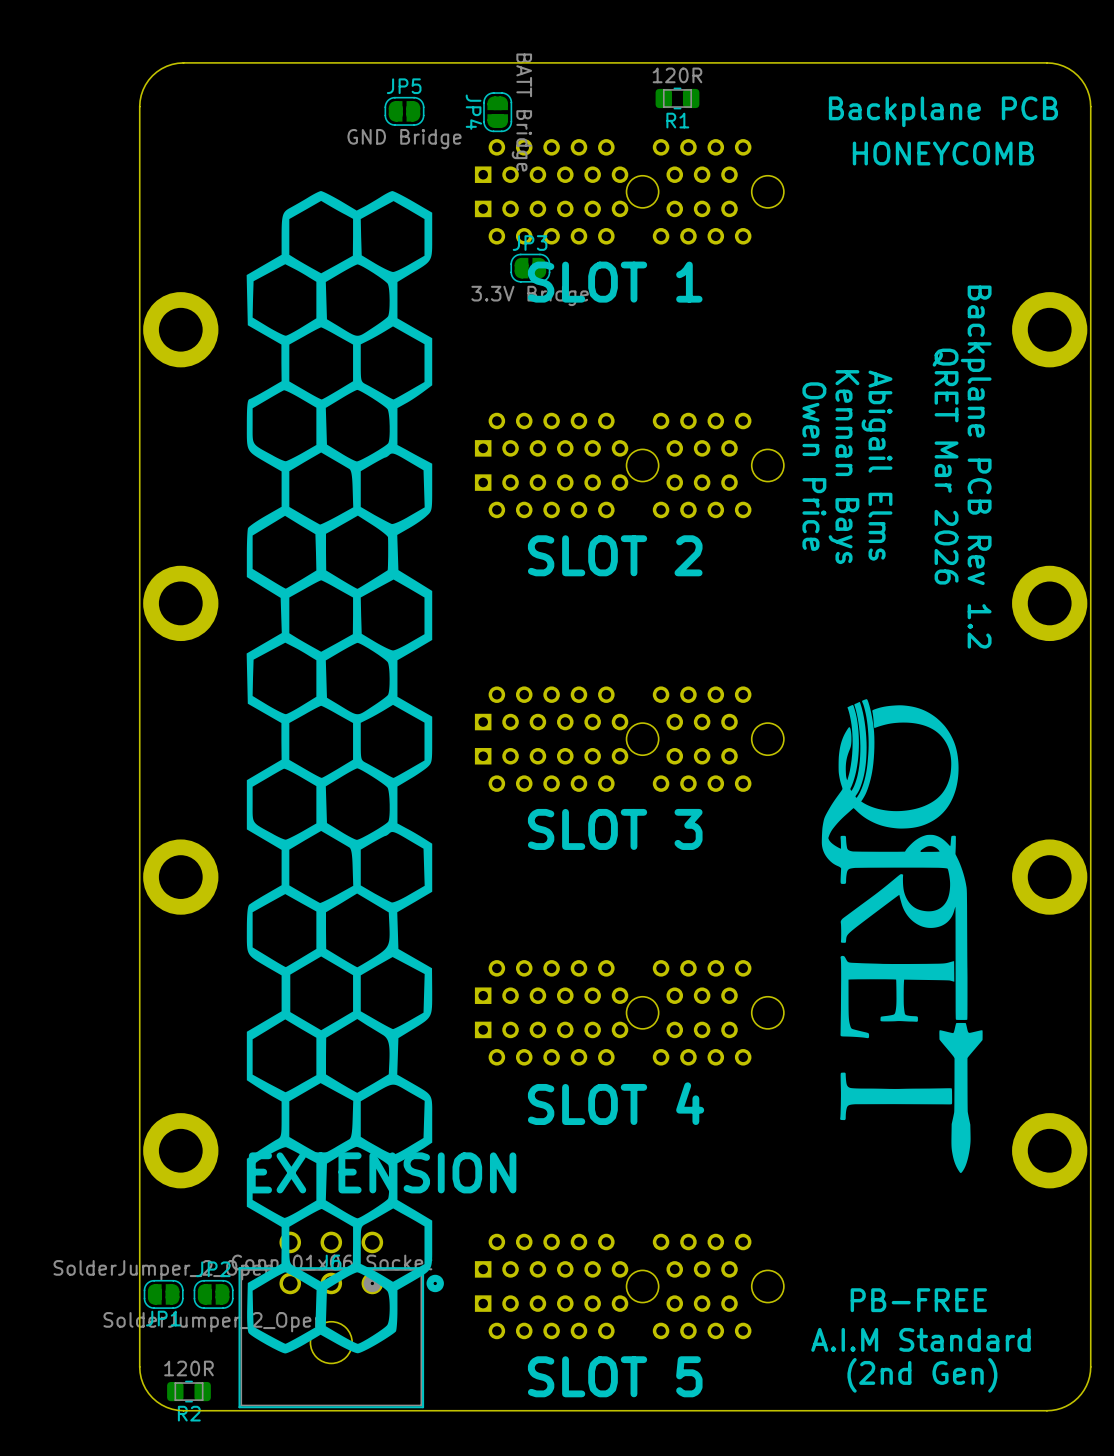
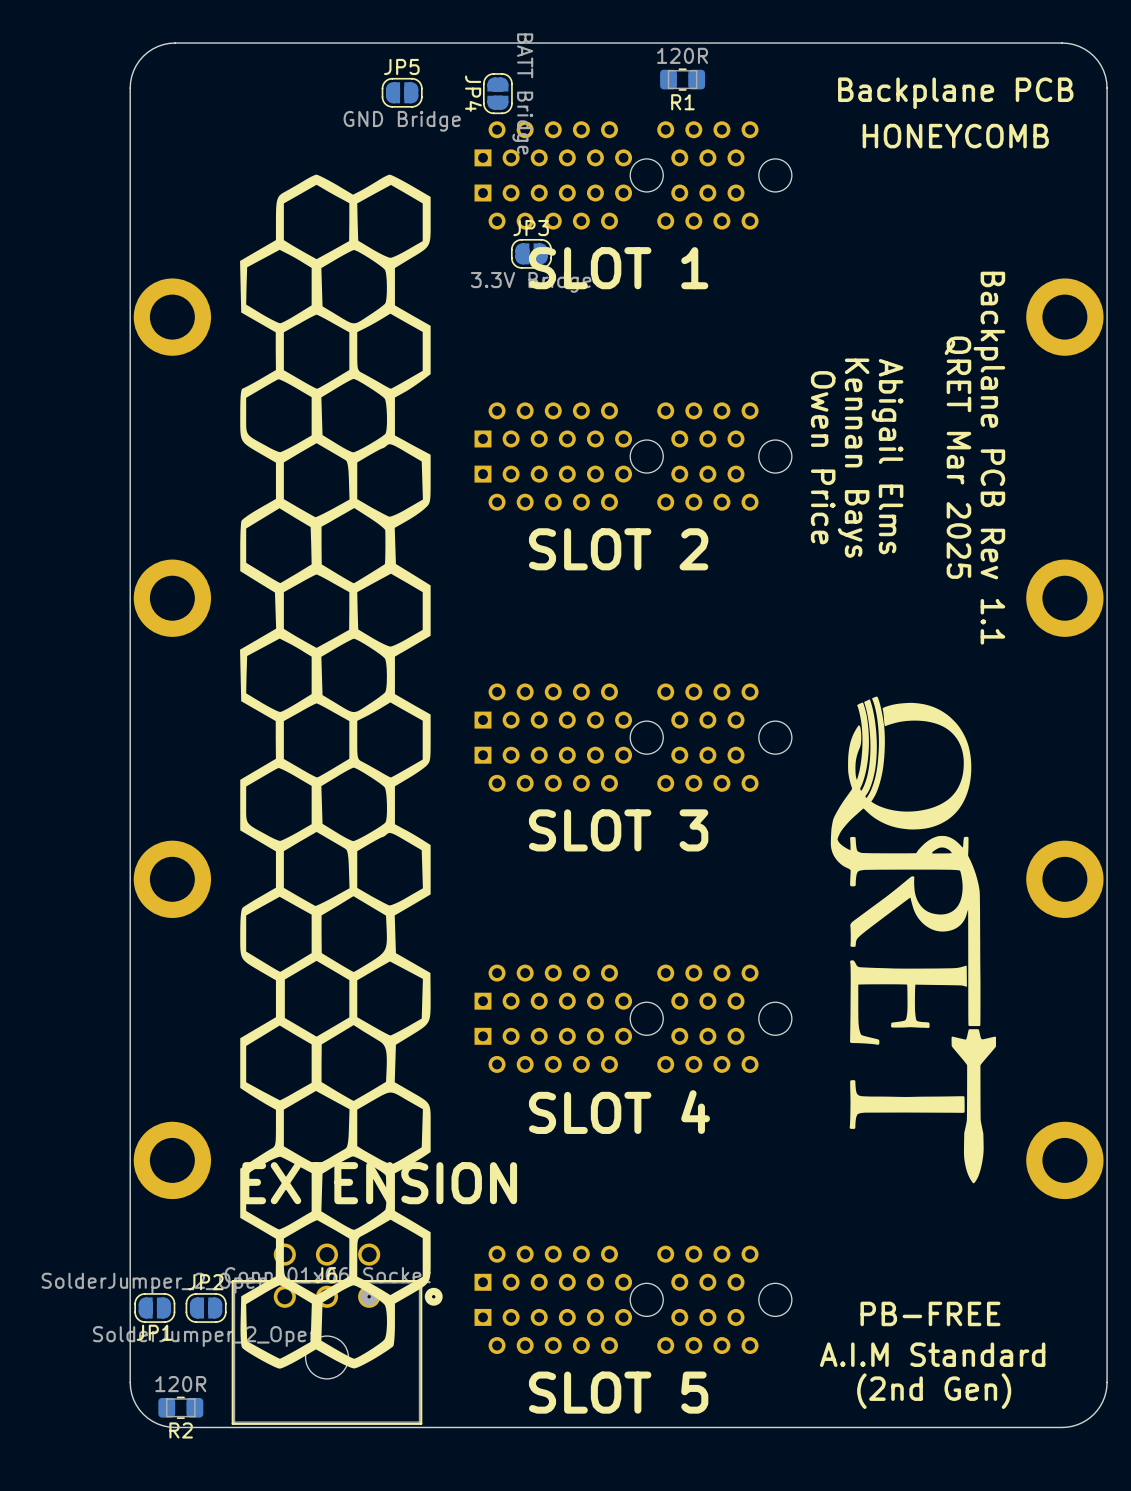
text: QRET Mar 2026 (945, 466) -> QRET Mar 2025 (957, 457)
text: Backplane PCB Rev 1.2 (976, 467) -> Backplane PCB Rev 1.1 (989, 458)

